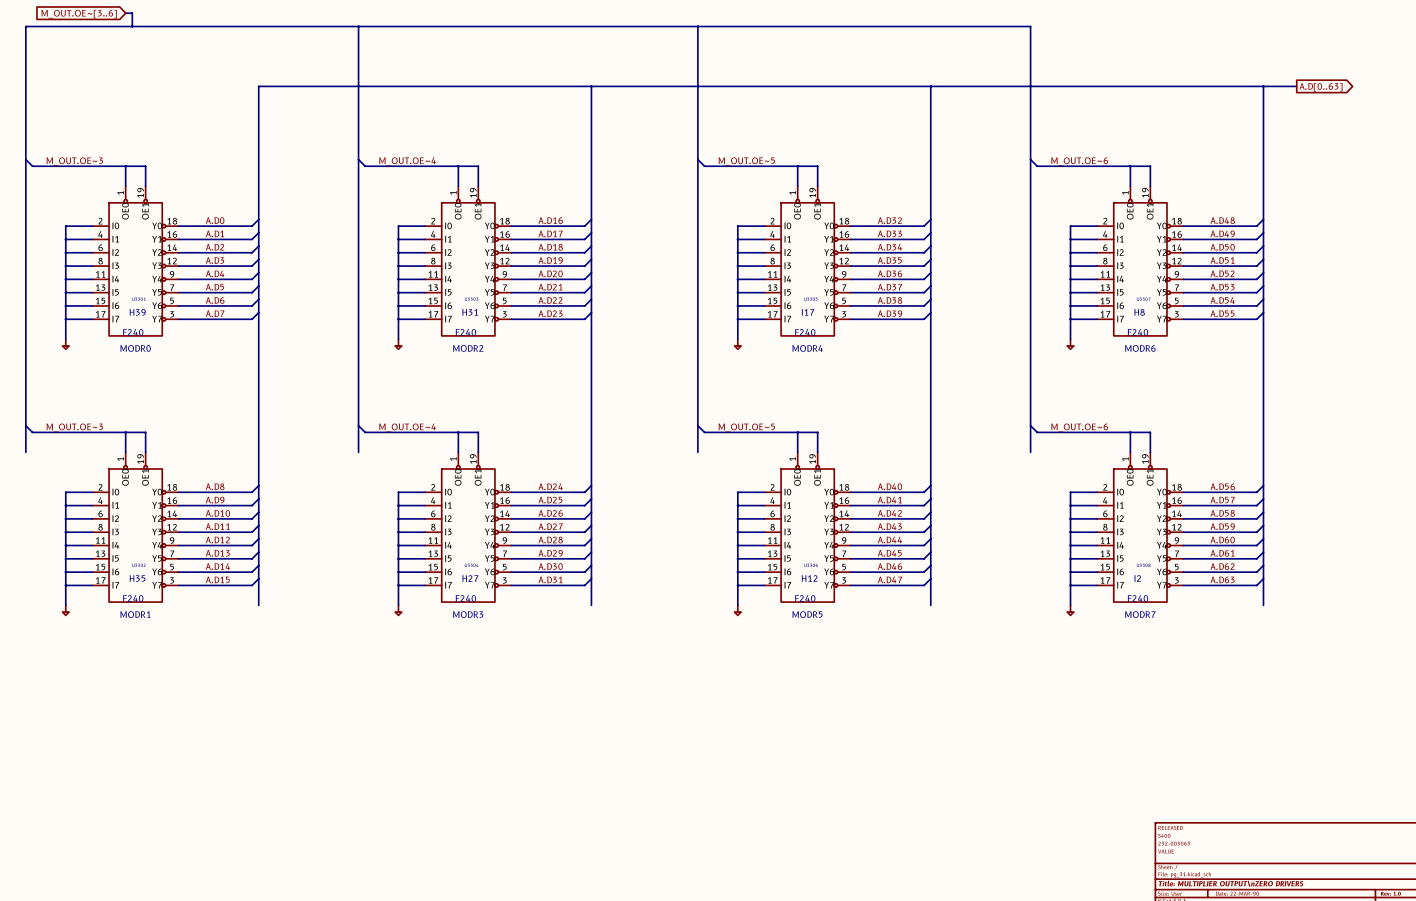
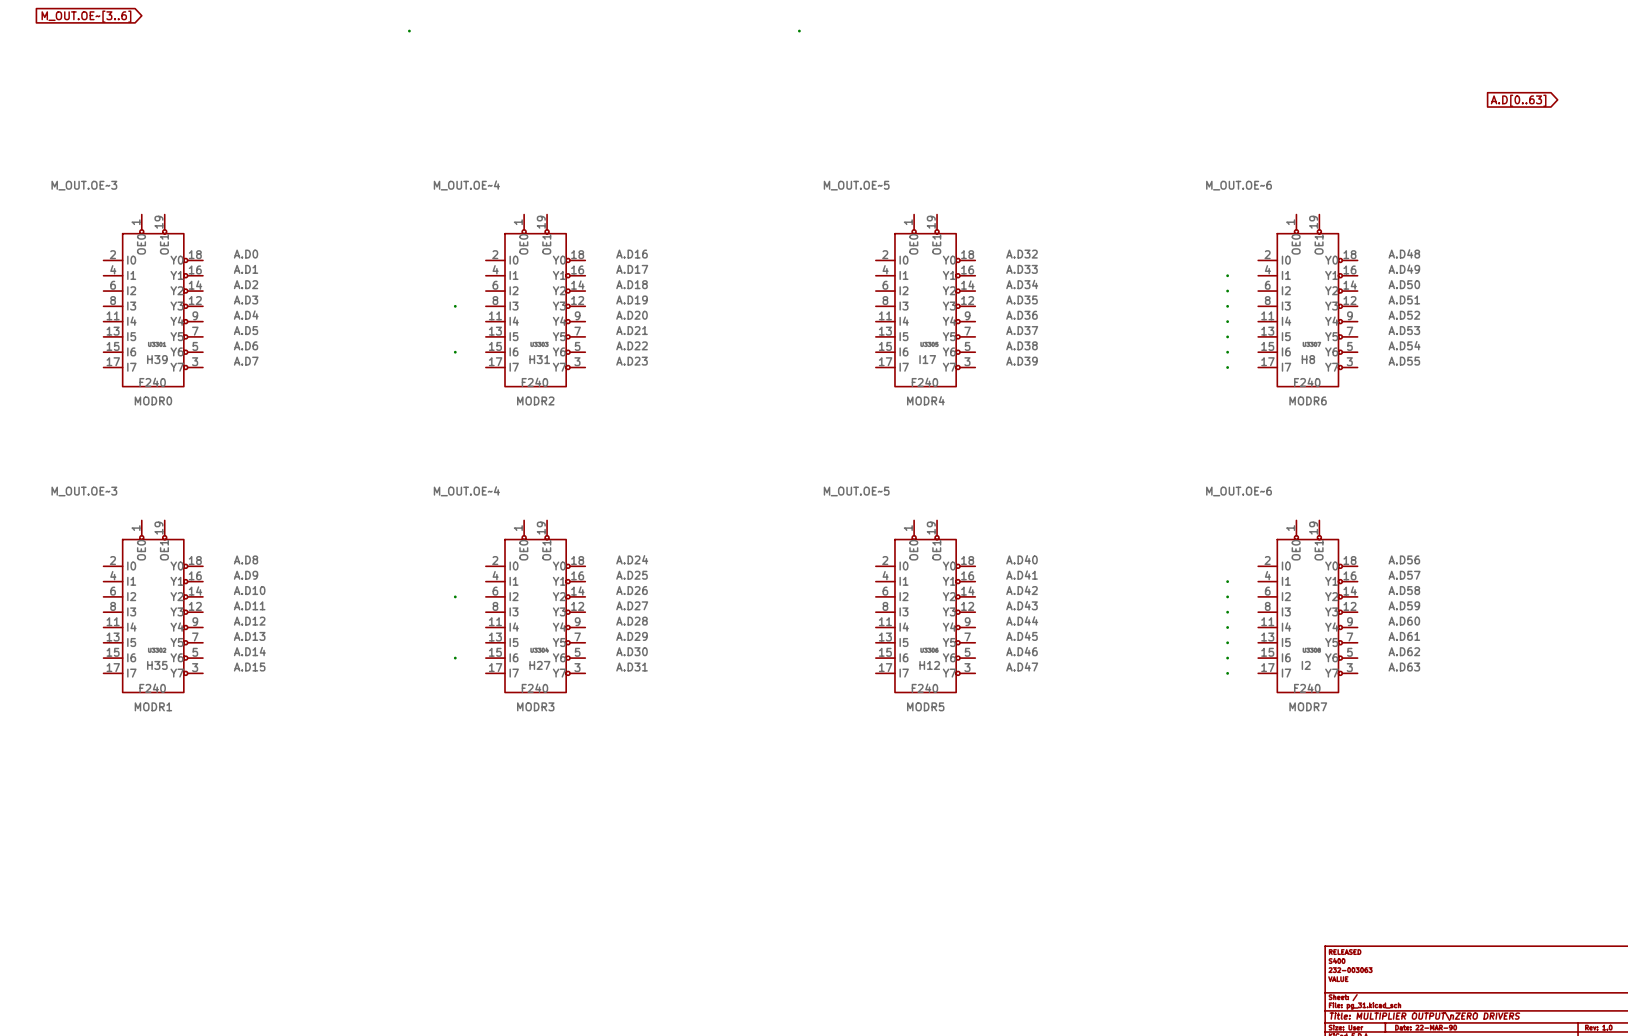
bus: (125, 13) (132, 13) (132, 26) -> none
bus: (358, 26) (358, 452) -> none
bus: (697, 26) (697, 452) -> none
bus: (591, 86) (591, 605) -> none
bus: (930, 86) (930, 605) -> none
bus: (1263, 86) (1263, 605) -> none
bus: (1296, 86) (258, 86) (258, 605) -> none
wire: (25, 159) (32, 166) (145, 166) (145, 186) -> none
wire: (358, 159) (365, 166) (478, 166) (478, 186) -> none
wire: (697, 159) (704, 166) (817, 166) (817, 186) -> none
wire: (1030, 159) (1037, 166) (1150, 166) (1150, 186) -> none
wire: (125, 166) (125, 186) -> none
wire: (458, 166) (458, 186) -> none
wire: (797, 166) (797, 186) -> none
wire: (1130, 166) (1130, 186) -> none
wire: (258, 219) (252, 226) (178, 226) -> none
wire: (591, 219) (584, 226) (511, 226) -> none
wire: (930, 219) (924, 226) (850, 226) -> none
wire: (1263, 219) (1256, 226) (1183, 226) -> none
wire: (92, 226) (65, 226) (65, 339) -> none
wire: (425, 226) (398, 226) (398, 339) -> none
wire: (764, 226) (737, 226) (737, 339) -> none
wire: (1097, 226) (1070, 226) (1070, 339) -> none
wire: (258, 232) (252, 239) (178, 239) -> none
wire: (591, 232) (584, 239) (511, 239) -> none
wire: (930, 232) (924, 239) (850, 239) -> none
wire: (1263, 232) (1256, 239) (1183, 239) -> none
wire: (65, 239) (92, 239) -> none
wire: (398, 239) (425, 239) -> none
wire: (737, 239) (764, 239) -> none
wire: (1070, 239) (1097, 239) -> none
wire: (258, 246) (252, 252) (178, 252) -> none
wire: (591, 246) (584, 252) (511, 252) -> none
wire: (930, 246) (924, 252) (850, 252) -> none
wire: (1263, 246) (1256, 252) (1183, 252) -> none
wire: (65, 252) (92, 252) -> none
wire: (398, 252) (425, 252) -> none
wire: (737, 252) (764, 252) -> none
wire: (1070, 252) (1097, 252) -> none
wire: (258, 259) (252, 266) (178, 266) -> none
wire: (591, 259) (584, 266) (511, 266) -> none
wire: (930, 259) (924, 266) (850, 266) -> none
wire: (1263, 259) (1256, 266) (1183, 266) -> none
wire: (65, 266) (92, 266) -> none
wire: (398, 266) (425, 266) -> none
wire: (737, 266) (764, 266) -> none
wire: (1070, 266) (1097, 266) -> none
wire: (258, 272) (252, 279) (178, 279) -> none
wire: (591, 272) (584, 279) (511, 279) -> none
wire: (930, 272) (924, 279) (850, 279) -> none
wire: (1263, 272) (1256, 279) (1183, 279) -> none
wire: (65, 279) (92, 279) -> none
wire: (398, 279) (425, 279) -> none
wire: (737, 279) (764, 279) -> none
wire: (1070, 279) (1097, 279) -> none
wire: (258, 286) (252, 292) (178, 292) -> none
wire: (591, 286) (584, 292) (511, 292) -> none
wire: (930, 286) (924, 292) (850, 292) -> none
wire: (1263, 286) (1256, 292) (1183, 292) -> none
wire: (65, 292) (92, 292) -> none
wire: (398, 292) (425, 292) -> none
wire: (737, 292) (764, 292) -> none
wire: (1070, 292) (1097, 292) -> none
wire: (258, 299) (252, 305) (178, 305) -> none
wire: (591, 299) (584, 305) (511, 305) -> none
wire: (930, 299) (924, 305) (850, 305) -> none
wire: (1263, 299) (1256, 305) (1183, 305) -> none
wire: (65, 305) (92, 305) -> none
wire: (398, 305) (425, 305) -> none
wire: (737, 305) (764, 305) -> none
wire: (1070, 305) (1097, 305) -> none
wire: (258, 312) (252, 319) (178, 319) -> none
wire: (591, 312) (584, 319) (511, 319) -> none
wire: (930, 312) (924, 319) (850, 319) -> none
wire: (1263, 312) (1256, 319) (1183, 319) -> none
wire: (65, 319) (92, 319) -> none
wire: (398, 319) (425, 319) -> none
wire: (737, 319) (764, 319) -> none
wire: (1070, 319) (1097, 319) -> none
power symbol: (65, 344) -> none
power symbol: (398, 344) -> none
power symbol: (737, 344) -> none
power symbol: (1070, 344) -> none
wire: (25, 425) (32, 432) (145, 432) (145, 452) -> none
wire: (358, 425) (365, 432) (478, 432) (478, 452) -> none
wire: (697, 425) (704, 432) (817, 432) (817, 452) -> none
wire: (1030, 425) (1037, 432) (1150, 432) (1150, 452) -> none
wire: (125, 432) (125, 452) -> none
wire: (458, 432) (458, 452) -> none
wire: (797, 432) (797, 452) -> none
wire: (1130, 432) (1130, 452) -> none
bus: (25, 452) (25, 26) (1030, 26) (1030, 452) -> none
wire: (258, 485) (252, 492) (178, 492) -> none
wire: (591, 485) (584, 492) (511, 492) -> none
wire: (930, 485) (924, 492) (850, 492) -> none
wire: (1263, 485) (1256, 492) (1183, 492) -> none
wire: (92, 492) (65, 492) (65, 605) -> none
wire: (425, 492) (398, 492) (398, 605) -> none
wire: (764, 492) (737, 492) (737, 605) -> none
wire: (1097, 492) (1070, 492) (1070, 605) -> none
wire: (258, 498) (252, 505) (178, 505) -> none
wire: (591, 498) (584, 505) (511, 505) -> none
wire: (930, 498) (924, 505) (850, 505) -> none
wire: (1263, 498) (1256, 505) (1183, 505) -> none
wire: (65, 505) (92, 505) -> none
wire: (398, 505) (425, 505) -> none
wire: (737, 505) (764, 505) -> none
wire: (1070, 505) (1097, 505) -> none
wire: (258, 512) (252, 518) (178, 518) -> none
wire: (591, 512) (584, 518) (511, 518) -> none
wire: (930, 512) (924, 518) (850, 518) -> none
wire: (1263, 512) (1256, 518) (1183, 518) -> none
wire: (65, 518) (92, 518) -> none
wire: (398, 518) (425, 518) -> none
wire: (737, 518) (764, 518) -> none
wire: (1070, 518) (1097, 518) -> none
wire: (258, 525) (252, 532) (178, 532) -> none
wire: (591, 525) (584, 532) (511, 532) -> none
wire: (930, 525) (924, 532) (850, 532) -> none
wire: (1263, 525) (1256, 532) (1183, 532) -> none
wire: (65, 532) (92, 532) -> none
wire: (398, 532) (425, 532) -> none
wire: (737, 532) (764, 532) -> none
wire: (1070, 532) (1097, 532) -> none
wire: (258, 538) (252, 545) (178, 545) -> none
wire: (591, 538) (584, 545) (511, 545) -> none
wire: (930, 538) (924, 545) (850, 545) -> none
wire: (1263, 538) (1256, 545) (1183, 545) -> none
wire: (65, 545) (92, 545) -> none
wire: (398, 545) (425, 545) -> none
wire: (737, 545) (764, 545) -> none
wire: (1070, 545) (1097, 545) -> none
wire: (258, 552) (252, 558) (178, 558) -> none
wire: (591, 552) (584, 558) (511, 558) -> none
wire: (930, 552) (924, 558) (850, 558) -> none
wire: (1263, 552) (1256, 558) (1183, 558) -> none
wire: (65, 558) (92, 558) -> none
wire: (398, 558) (425, 558) -> none
wire: (737, 558) (764, 558) -> none
wire: (1070, 558) (1097, 558) -> none
wire: (258, 565) (252, 572) (178, 572) -> none
wire: (591, 565) (584, 572) (511, 572) -> none
wire: (930, 565) (924, 572) (850, 572) -> none
wire: (1263, 565) (1256, 572) (1183, 572) -> none
wire: (65, 572) (92, 572) -> none
wire: (398, 572) (425, 572) -> none
wire: (737, 572) (764, 572) -> none
wire: (1070, 572) (1097, 572) -> none
wire: (258, 578) (252, 585) (178, 585) -> none
wire: (591, 578) (584, 585) (511, 585) -> none
wire: (930, 578) (924, 585) (850, 585) -> none
wire: (1263, 578) (1256, 585) (1183, 585) -> none
wire: (65, 585) (92, 585) -> none
wire: (398, 585) (425, 585) -> none
wire: (737, 585) (764, 585) -> none
wire: (1070, 585) (1097, 585) -> none
power symbol: (65, 610) -> none
power symbol: (398, 610) -> none
power symbol: (737, 610) -> none
power symbol: (1070, 610) -> none

